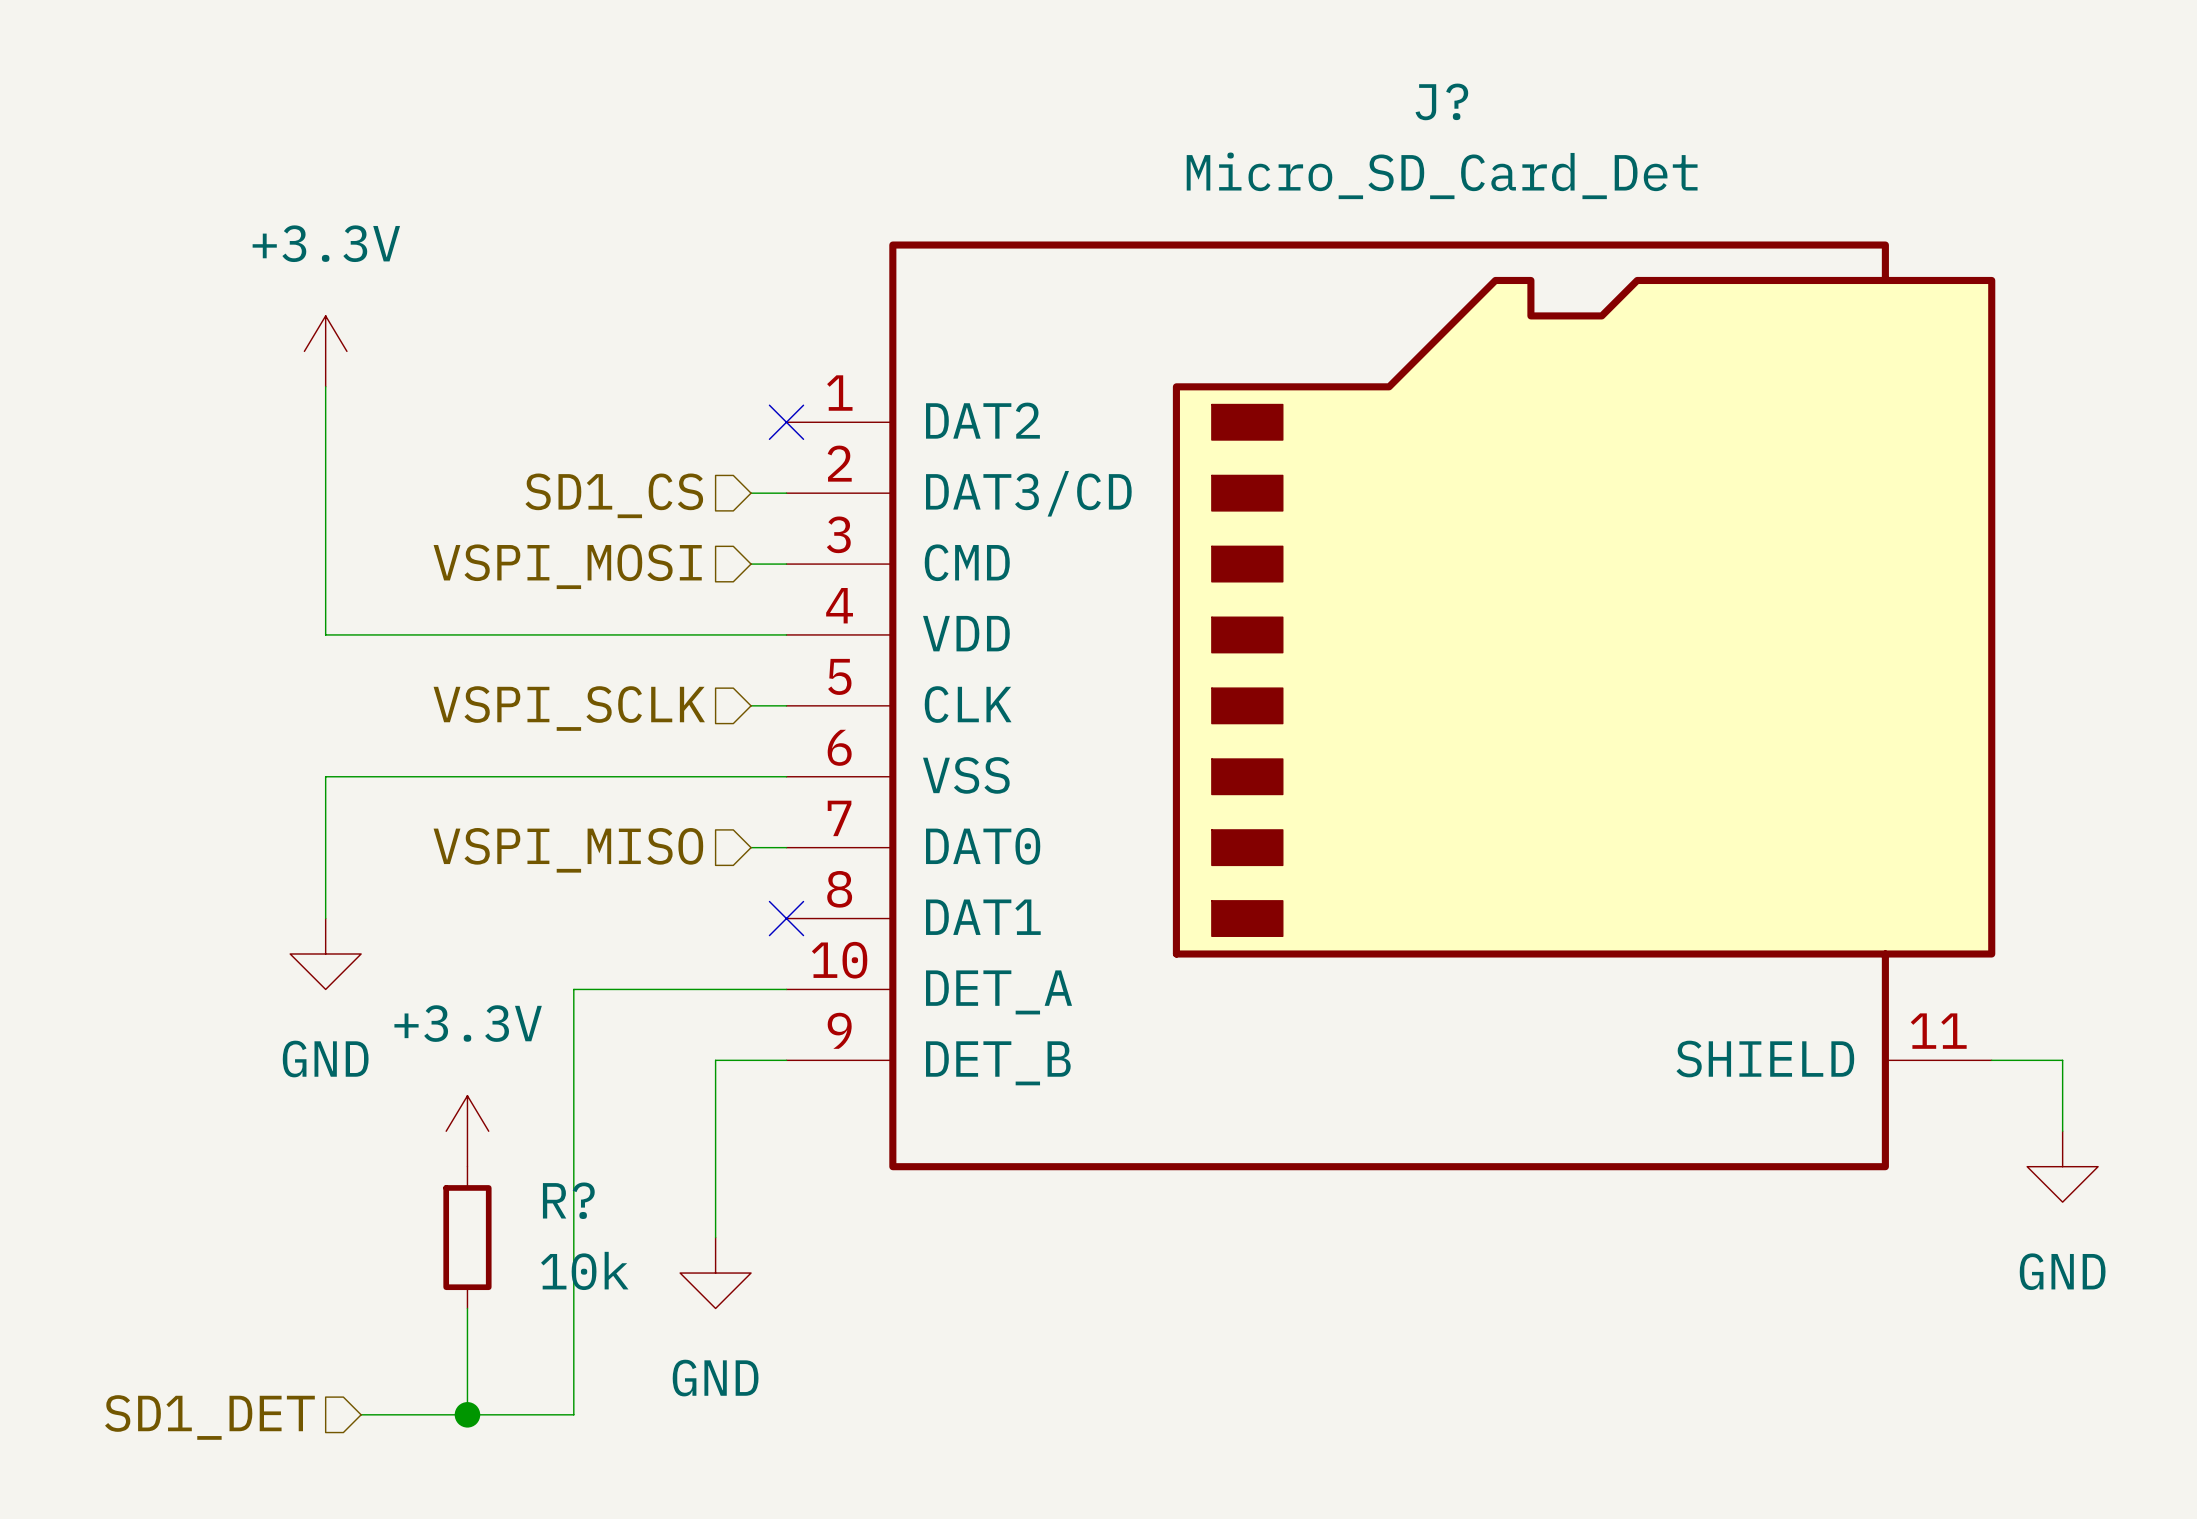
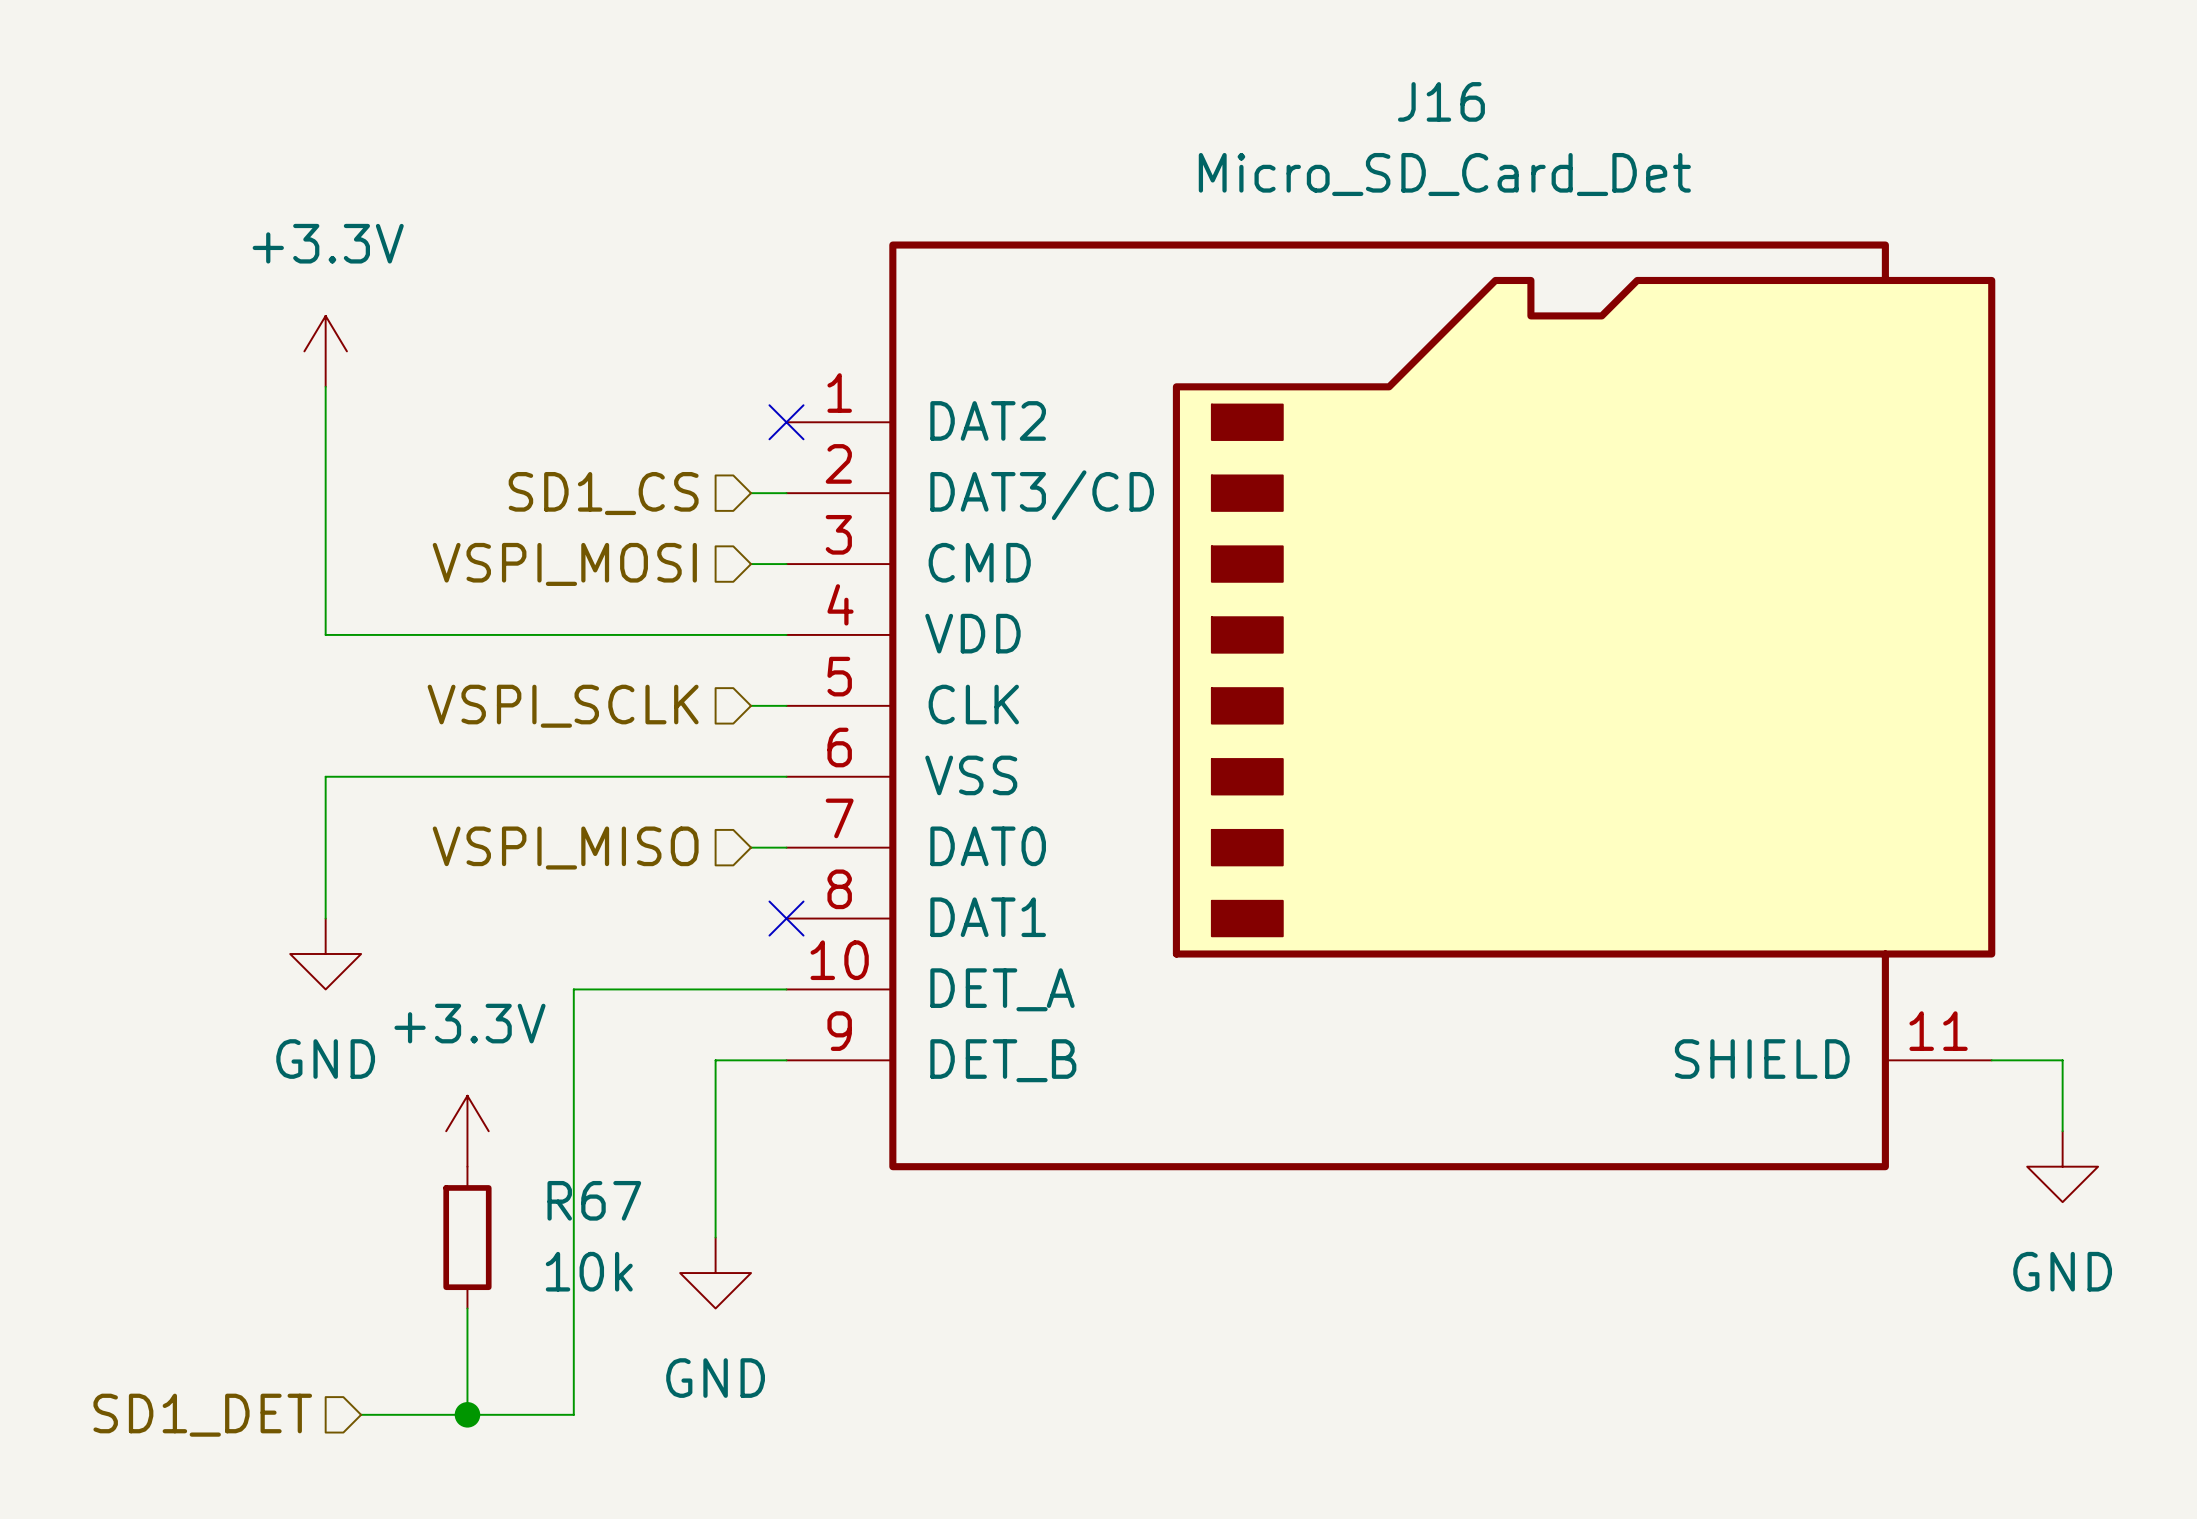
J? name: J? (1441, 101) -> J16 (1441, 101)
R? name: R? (568, 1200) -> R67 (594, 1200)

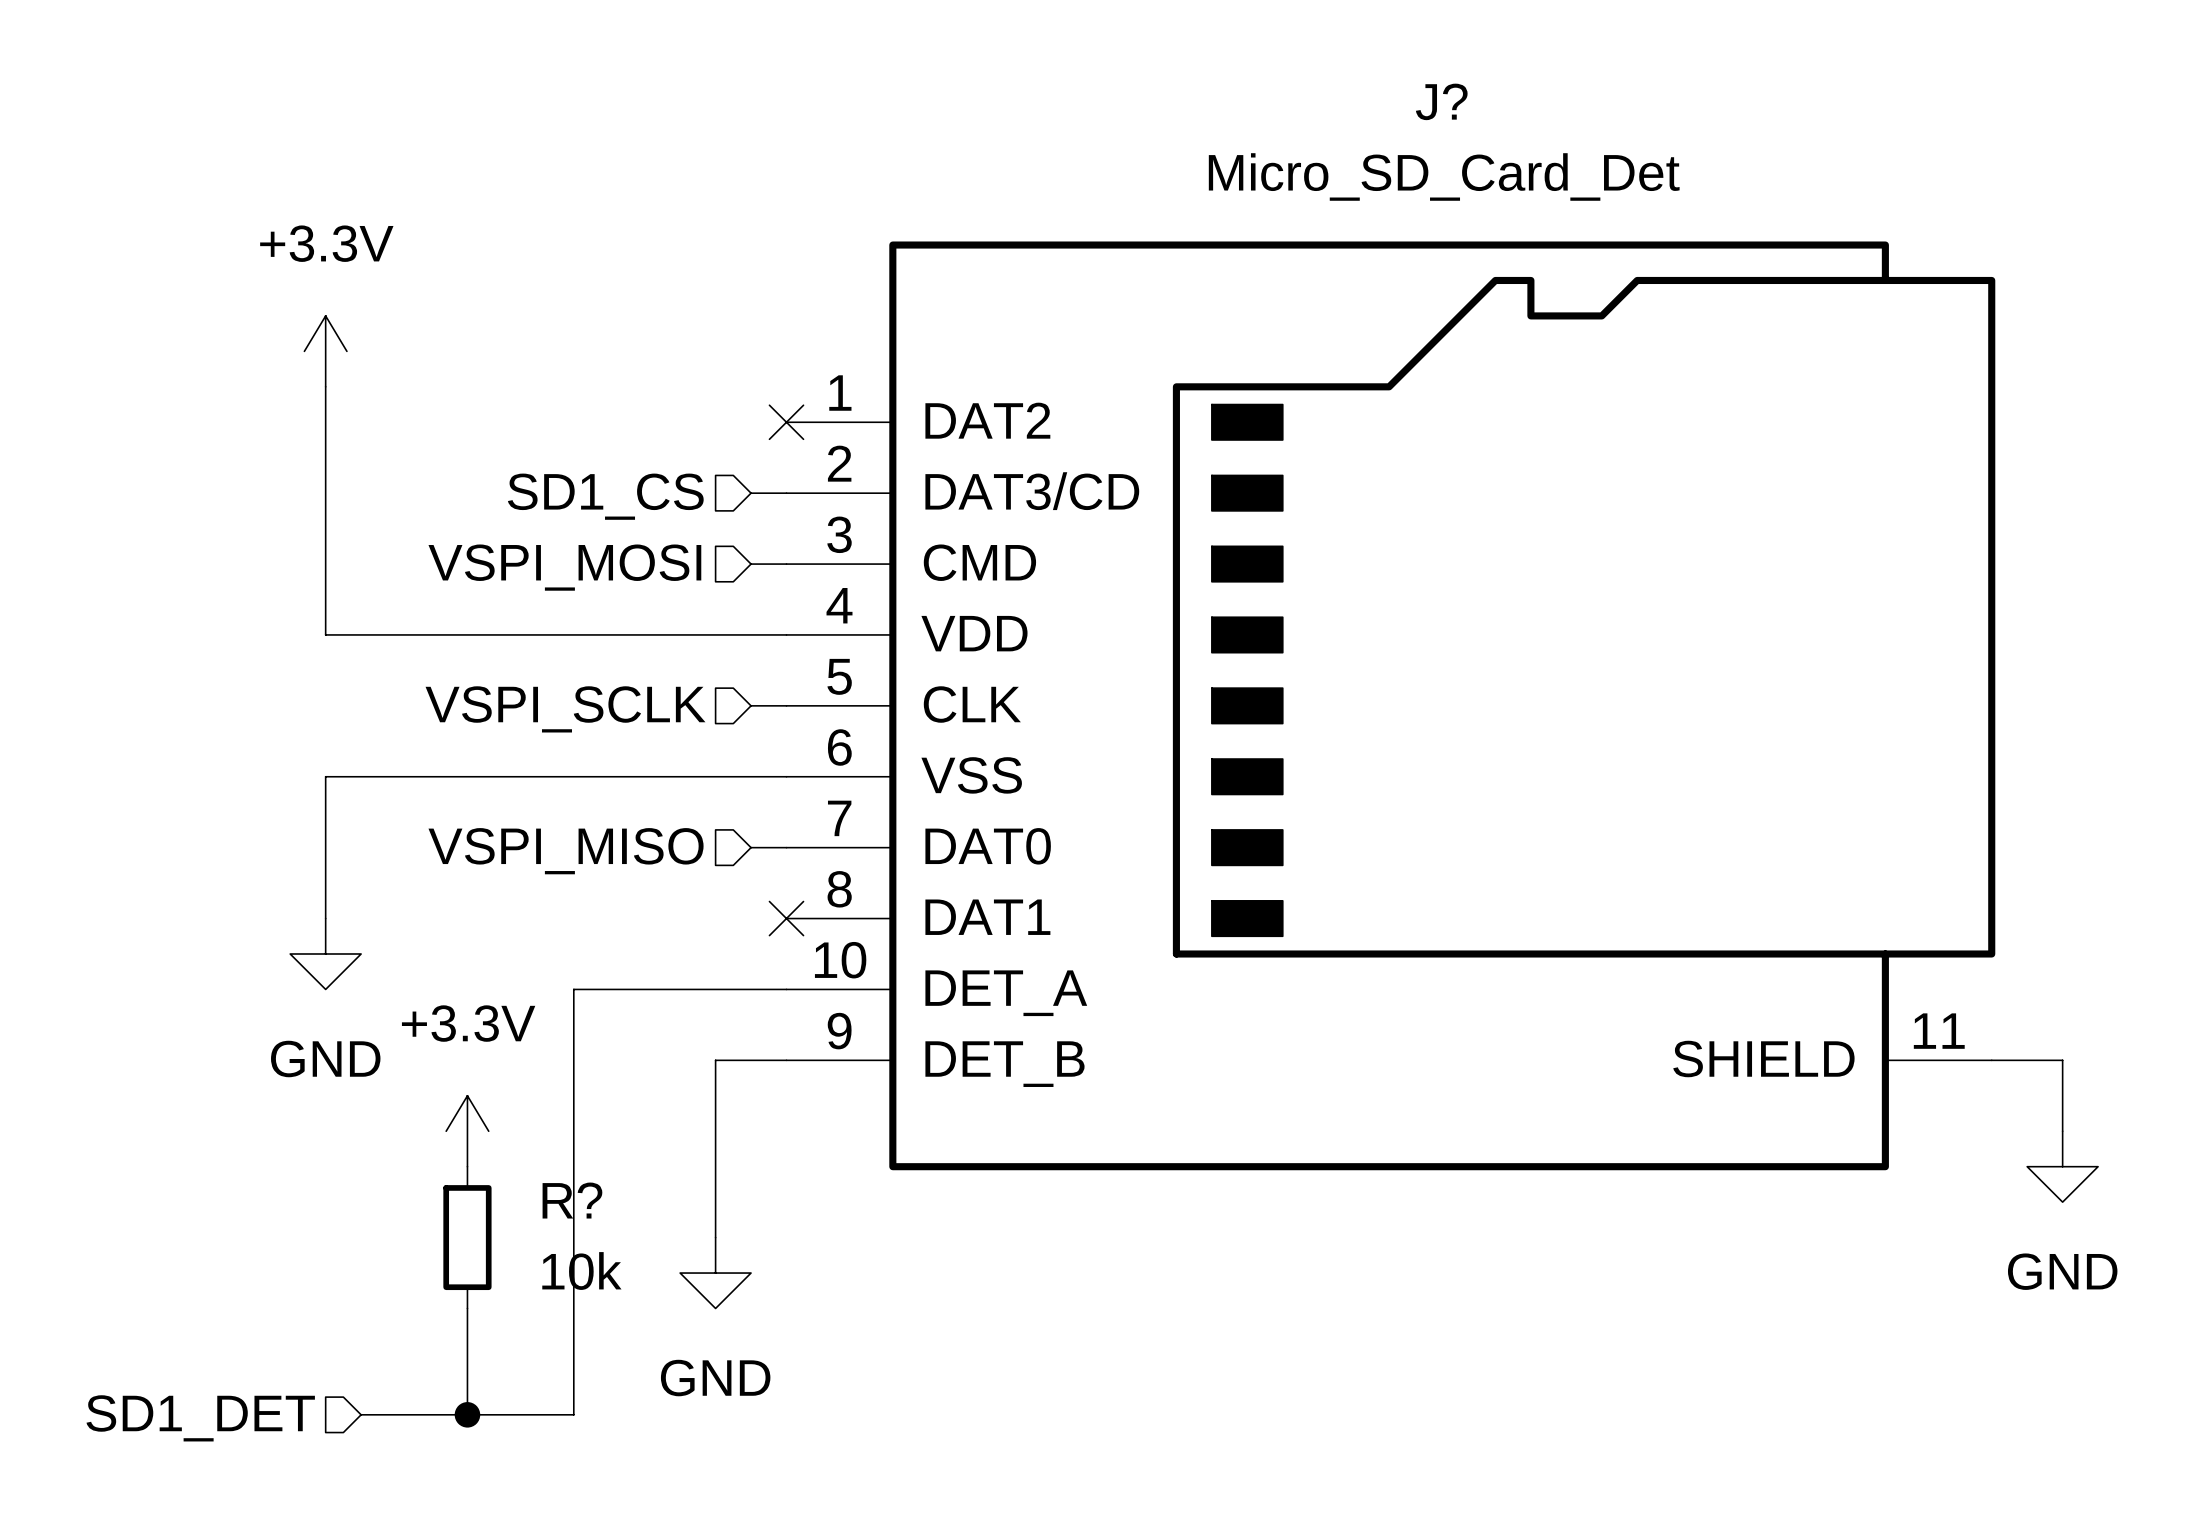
J16 name: J16 (1441, 101) -> J? (1441, 101)
R67 name: R67 (594, 1200) -> R? (572, 1200)

